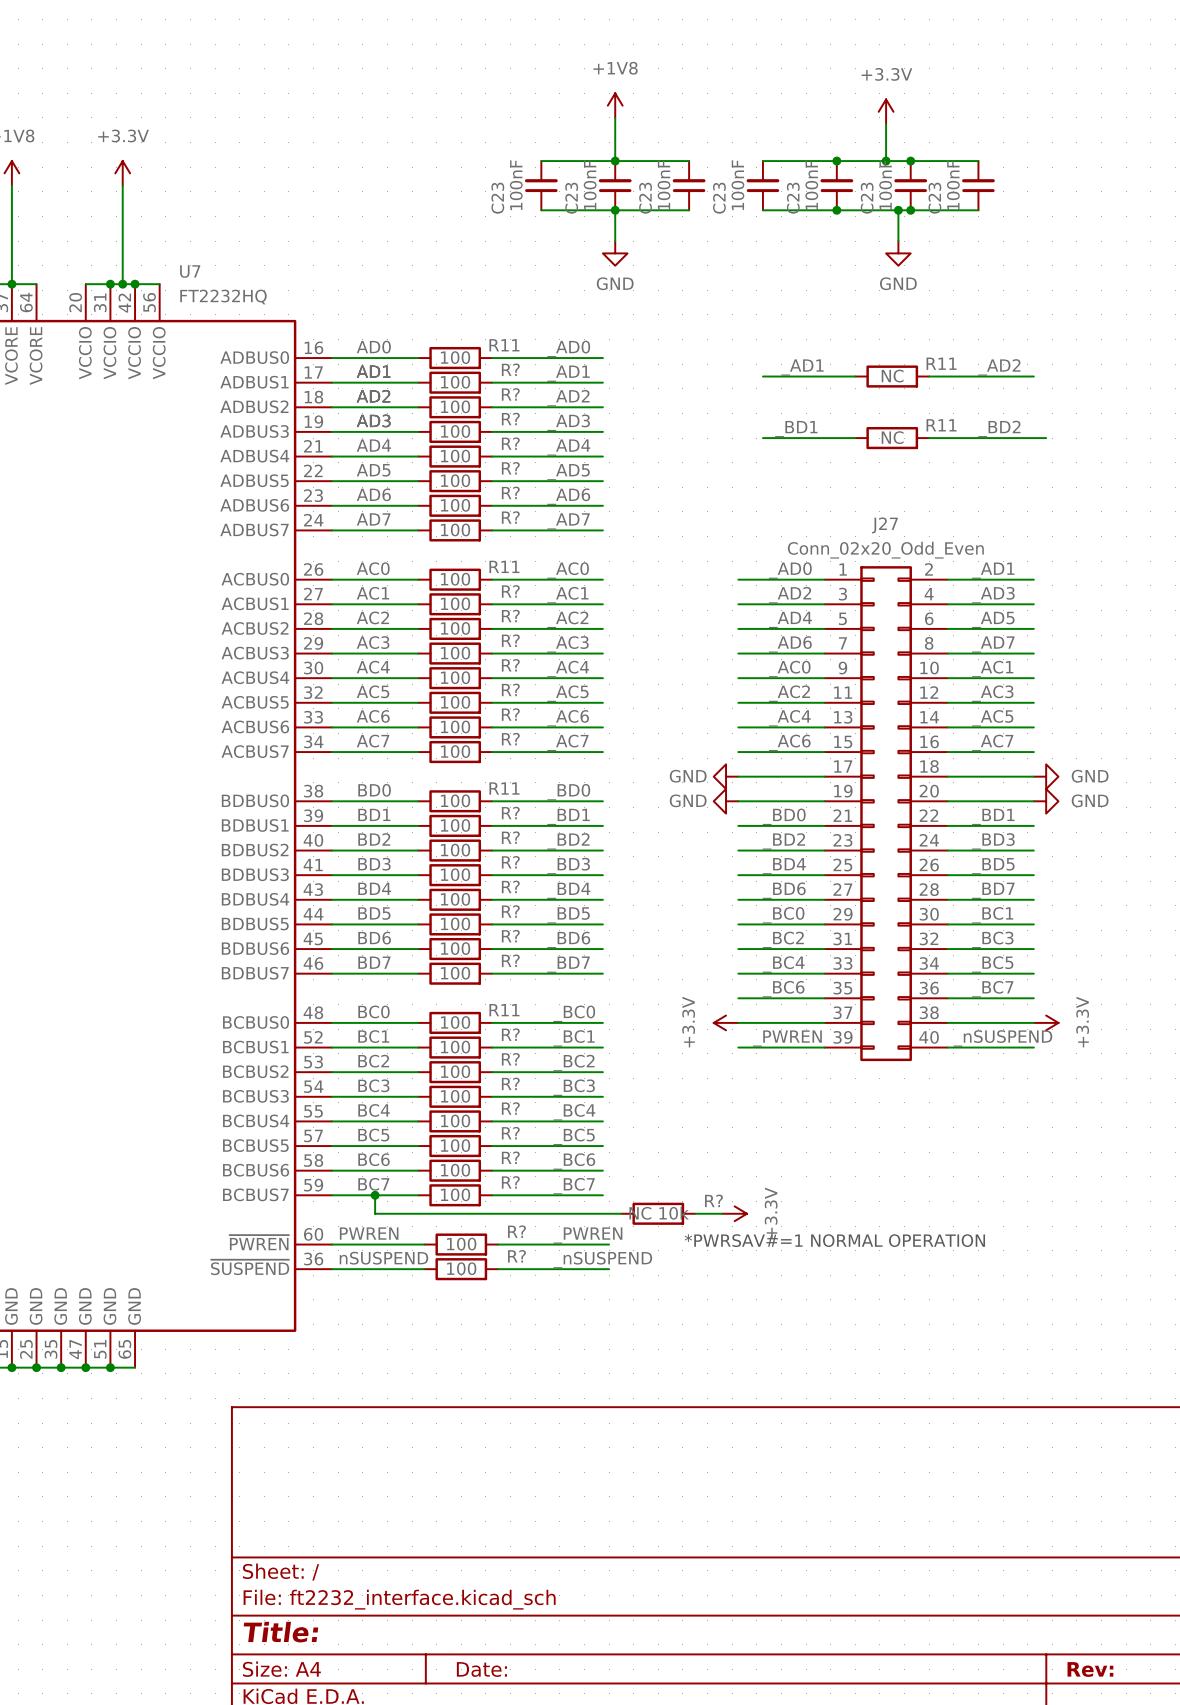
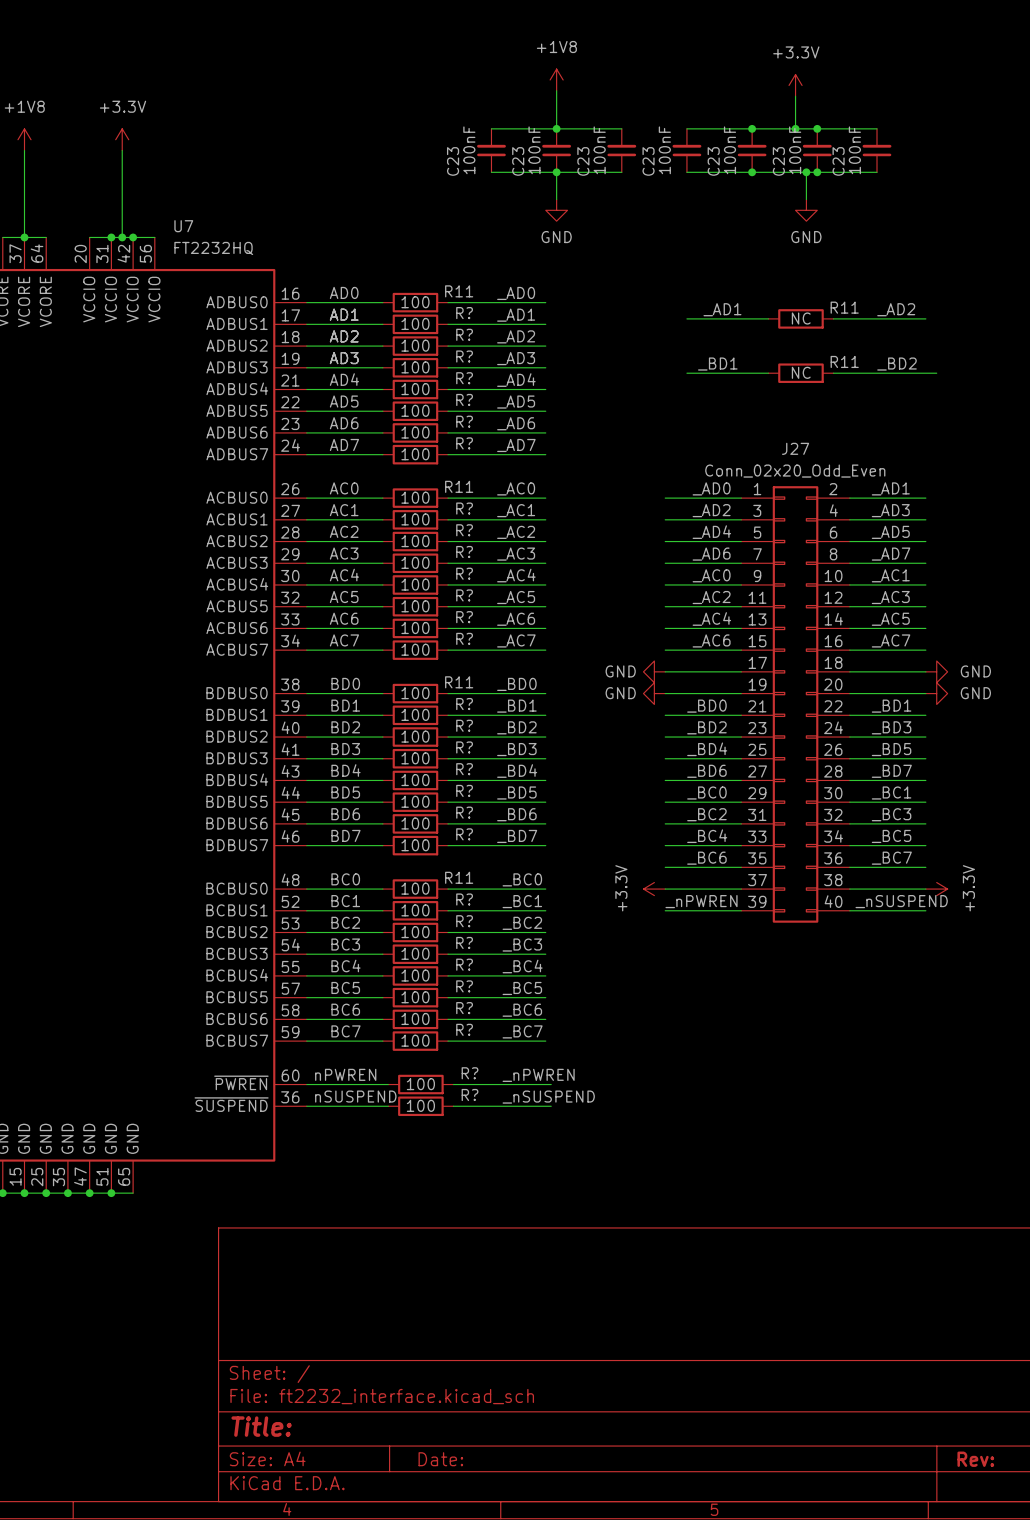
label: _PWREN (787, 1038) -> _nPWREN (701, 901)
wire: (375, 1195) (375, 1213) (621, 1213) -> none
junction: (375, 1195) -> none
R?: NC 10k (658, 1213) -> none
wire: (695, 1213) (722, 1213) -> none
power symbol: +3.3V (734, 1213) -> none
label: PWREN (369, 1233) -> nPWREN (345, 1074)
label: _PWREN (587, 1235) -> _nPWREN (538, 1075)
text: *PWRSAV#=1 NORMAL OPERATION (834, 1240) -> none

